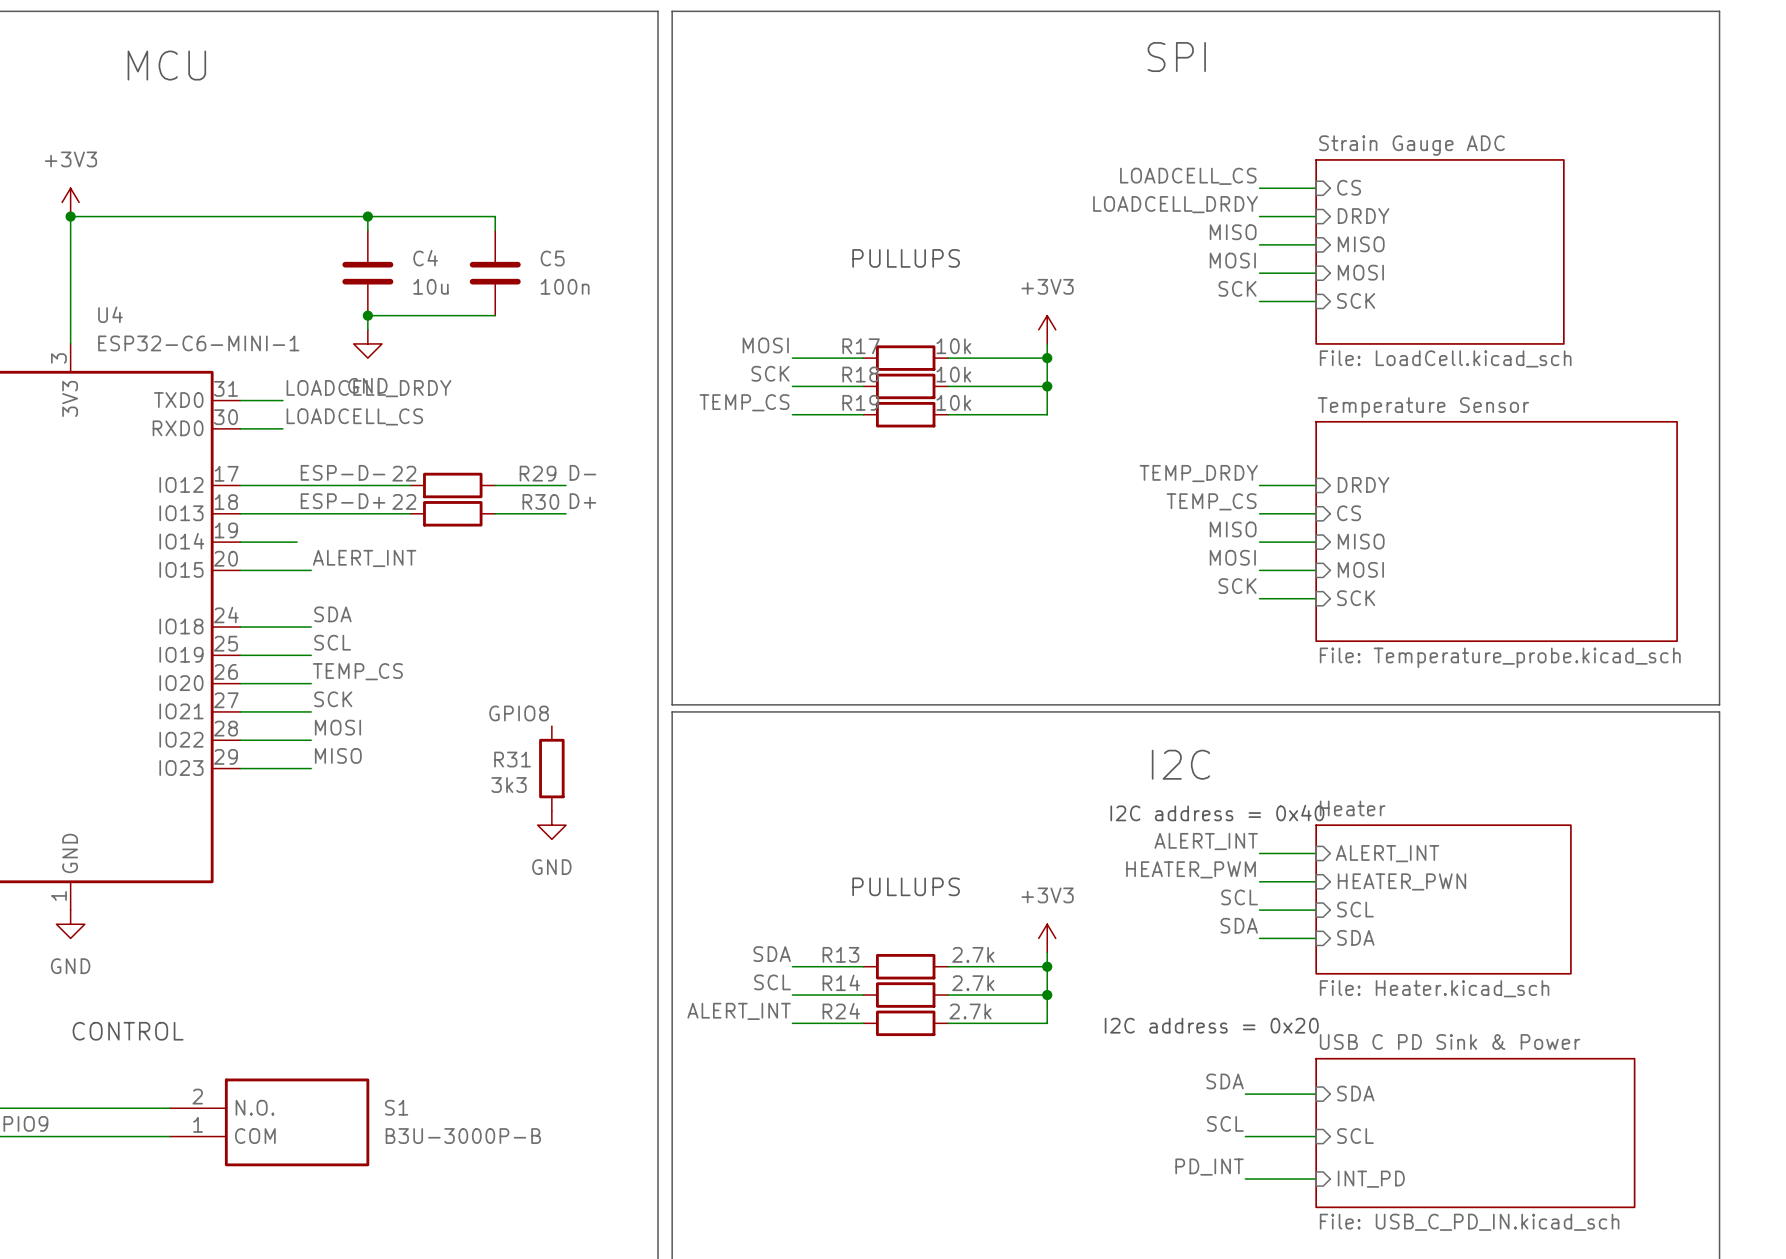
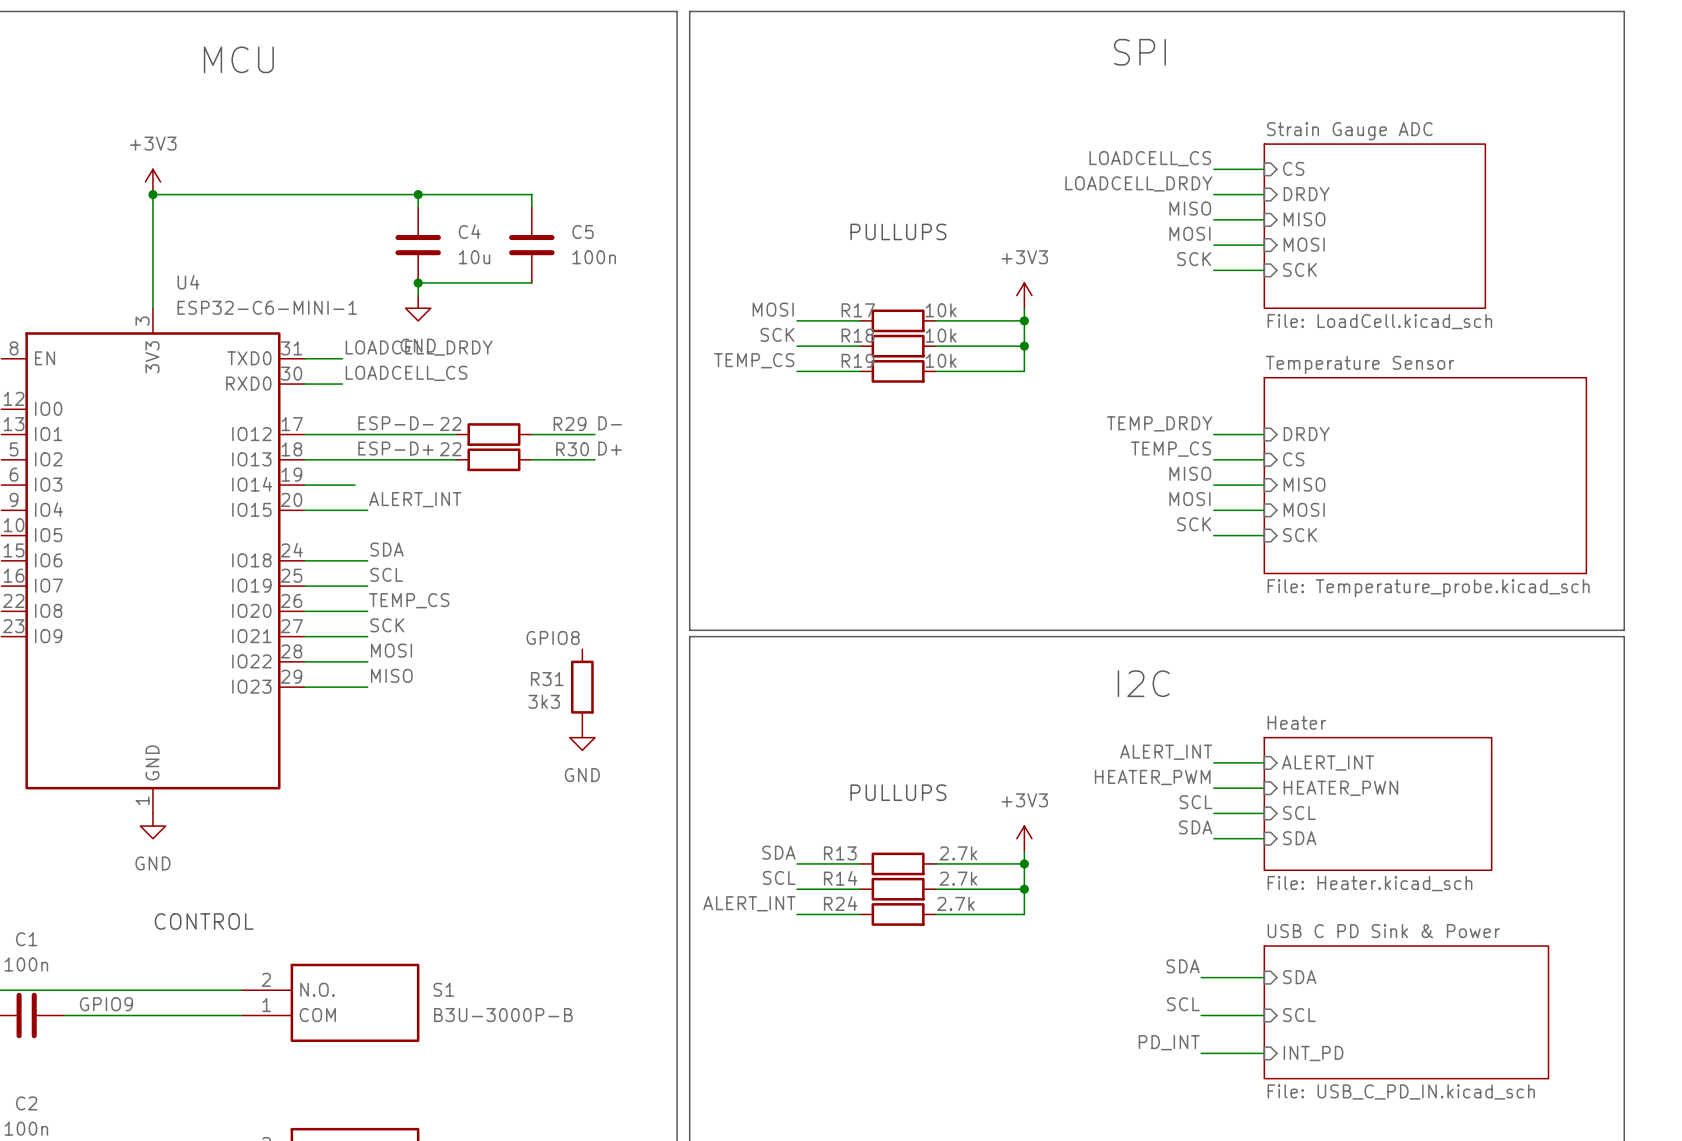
text: I2C address = 0x40 (1217, 813) -> none
text: I2C address = 0x20 (1211, 1025) -> none

